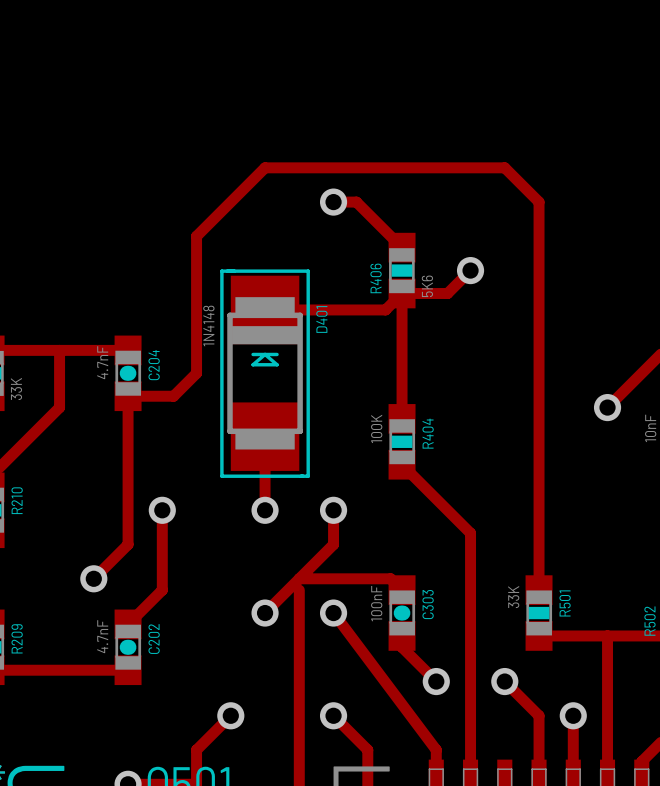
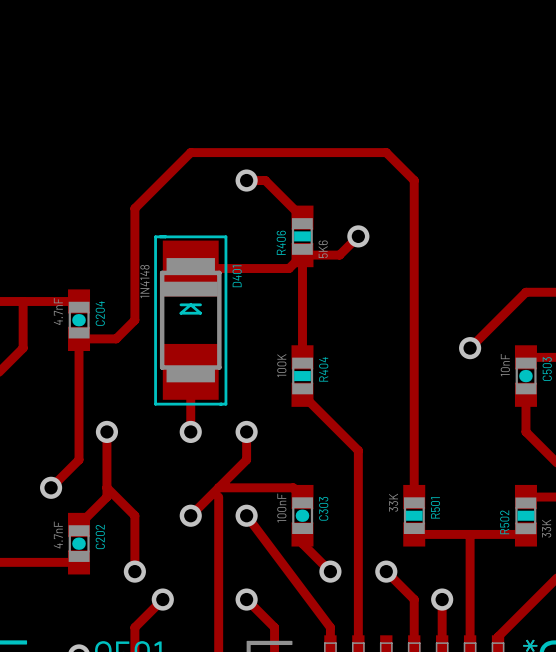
track: none -> (106, 487) (134, 515) (134, 571)
via: none -> (134, 571)

